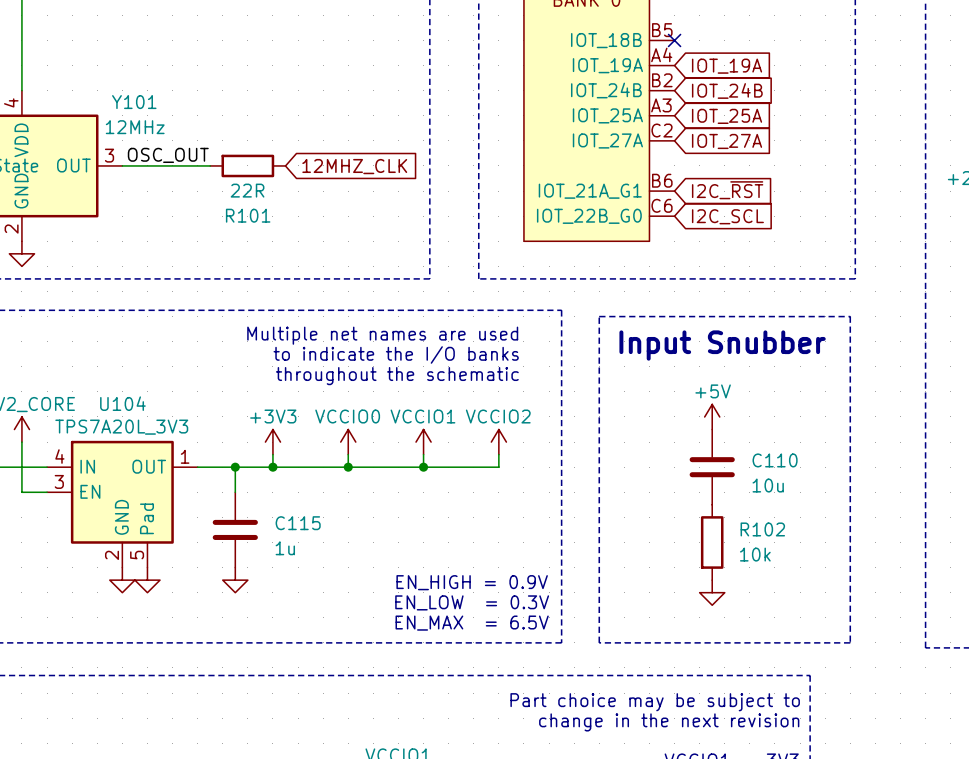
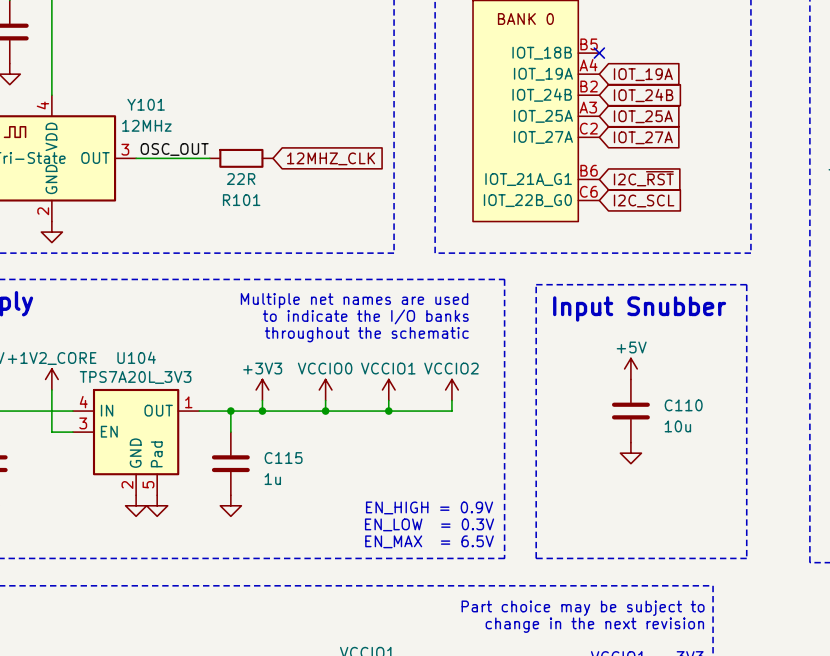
R102: 10k (712, 542) -> none
power symbol position: (712, 592) -> (630, 453)

